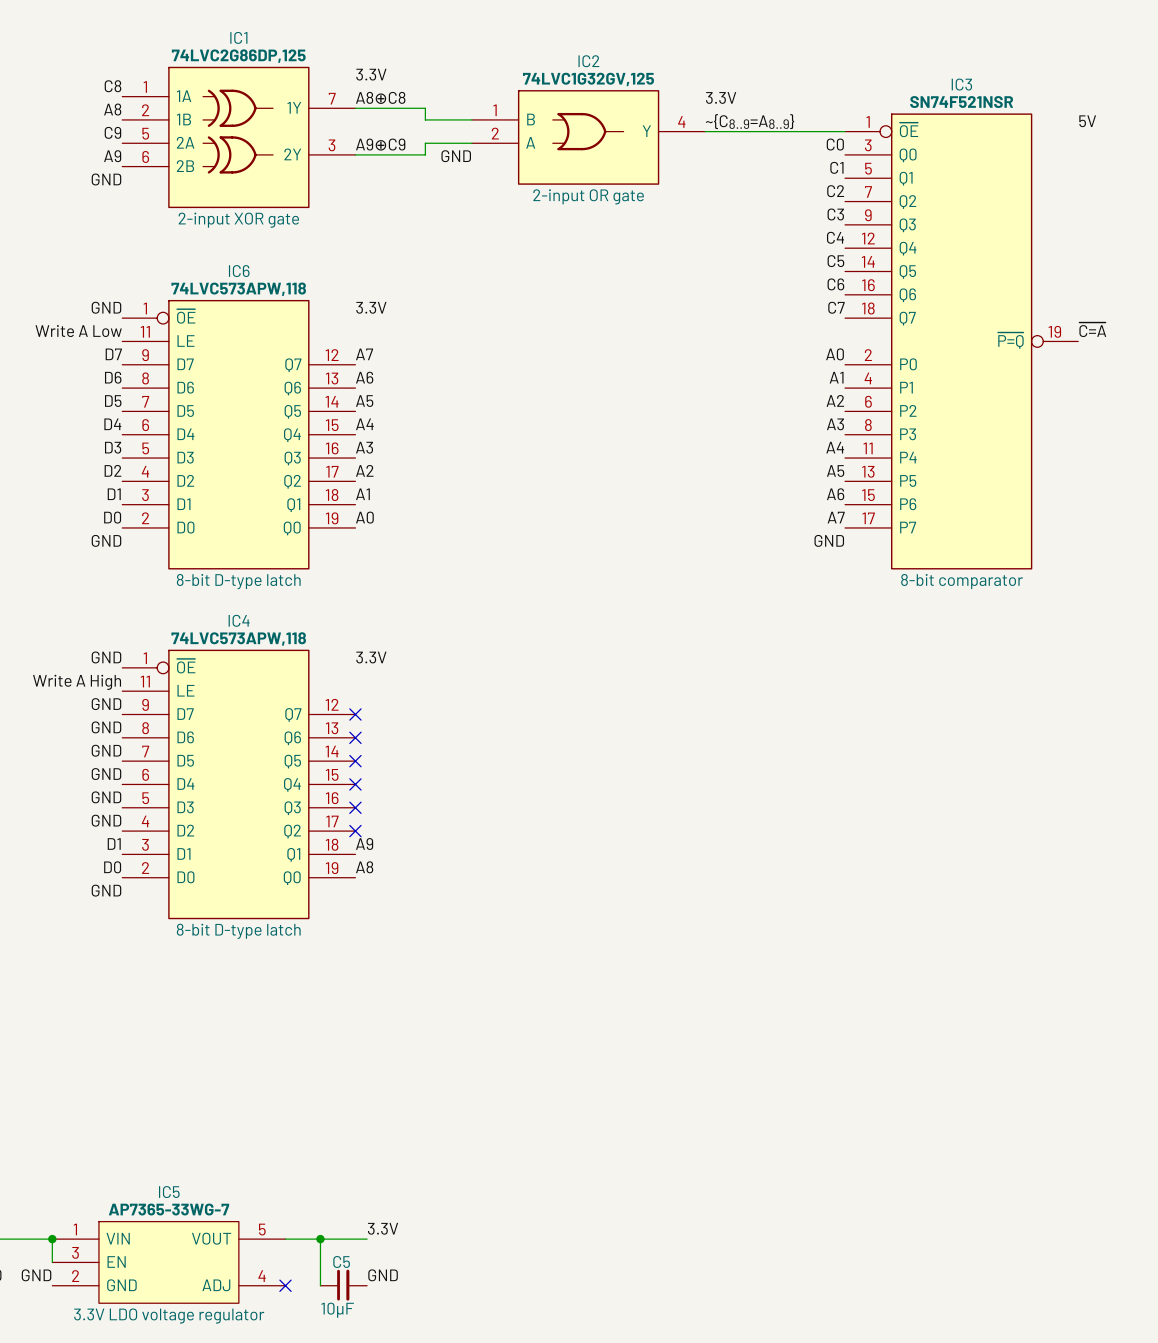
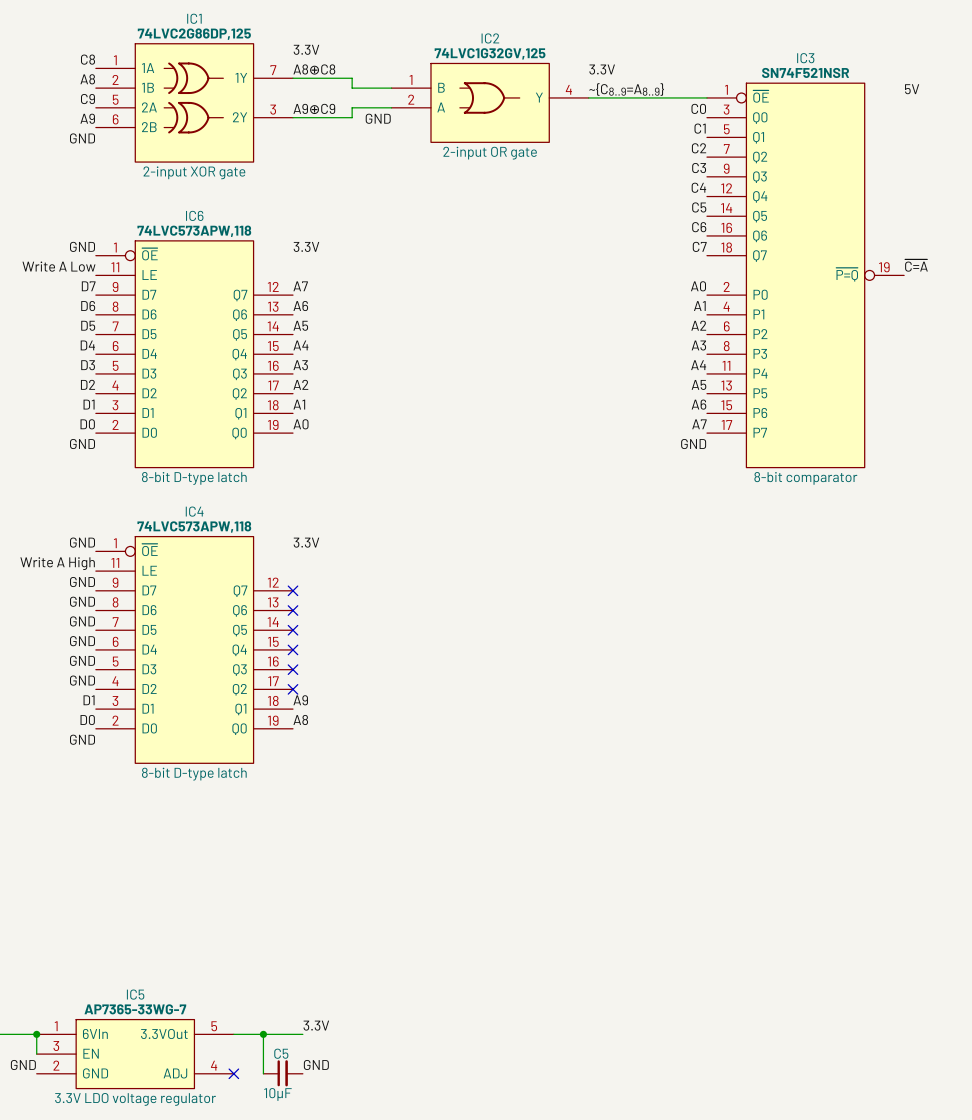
IC5 pin name: VIN (118, 1238) -> 6VIn (95, 1033)
IC5 pin name: VOUT (211, 1238) -> 3.3VOut (164, 1034)

